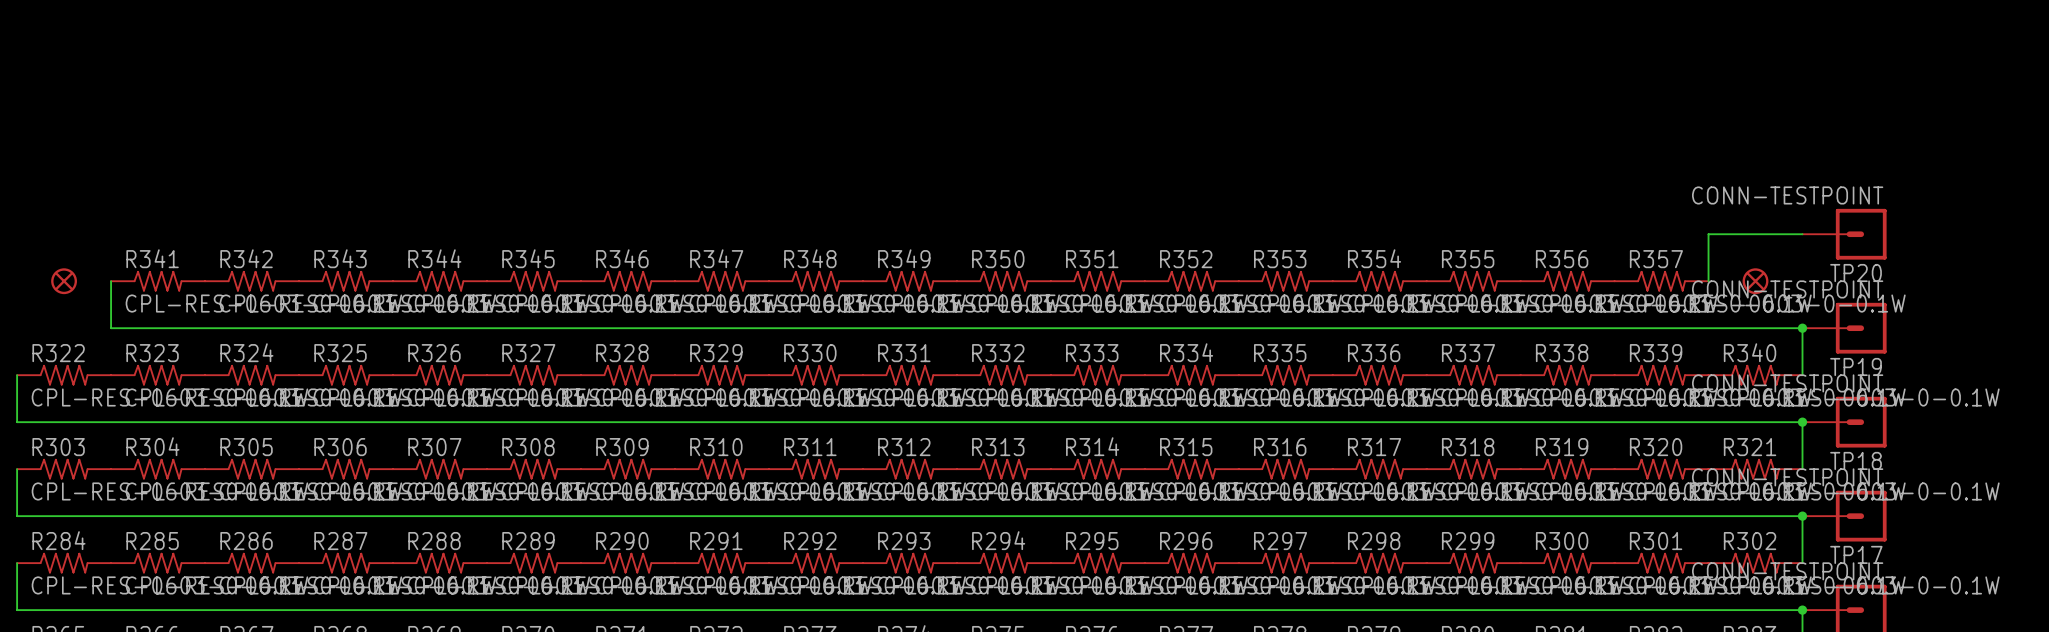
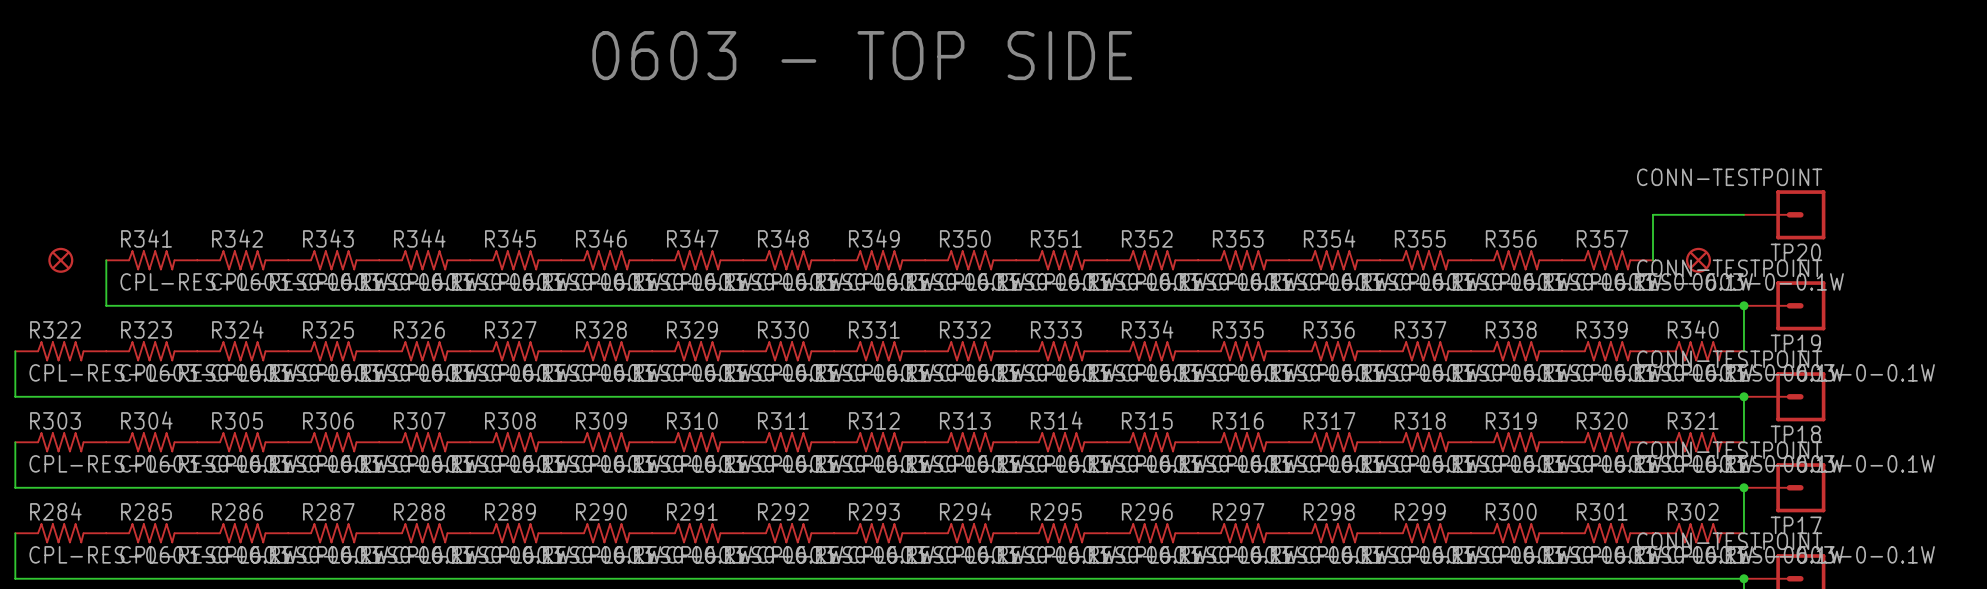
text: none -> 0603 - TOP SIDE (862, 55)

